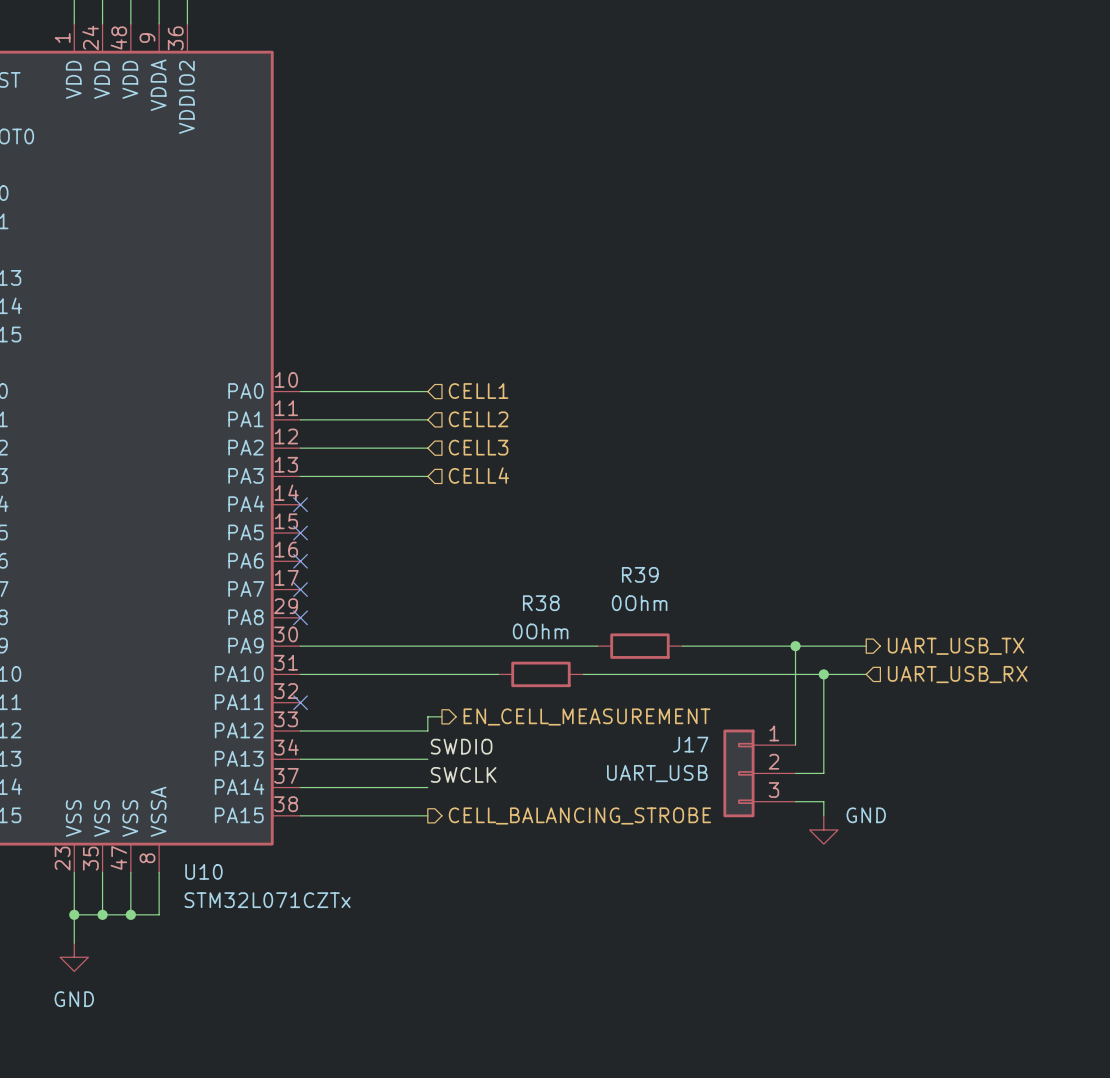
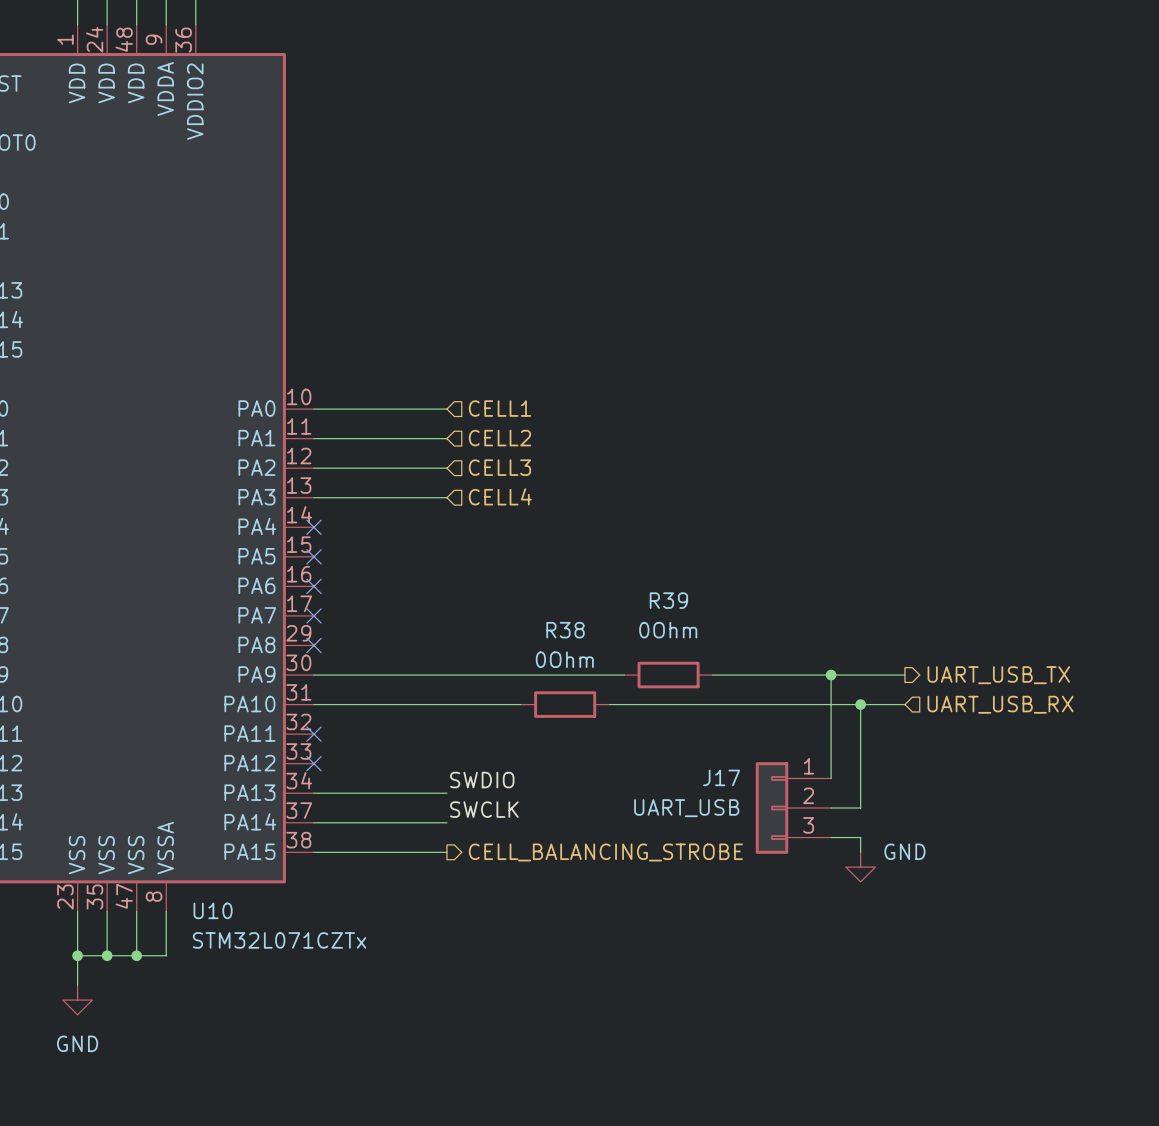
wire: (441, 716) (427, 716) (427, 730) (300, 730) -> none
hierarchical label: EN_CELL_MEASUREMENT (586, 716) -> none
no-connect mark: none -> (313, 763)

